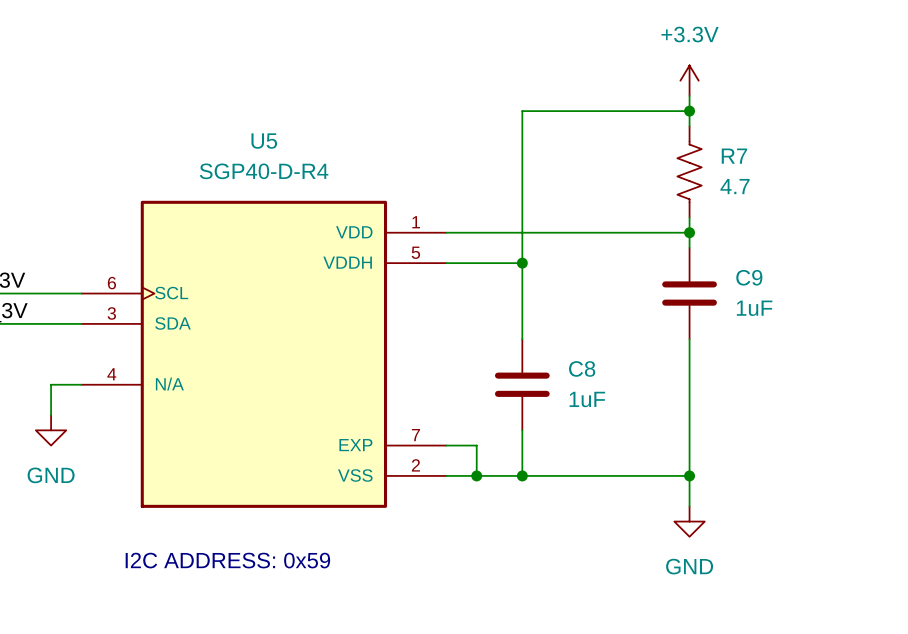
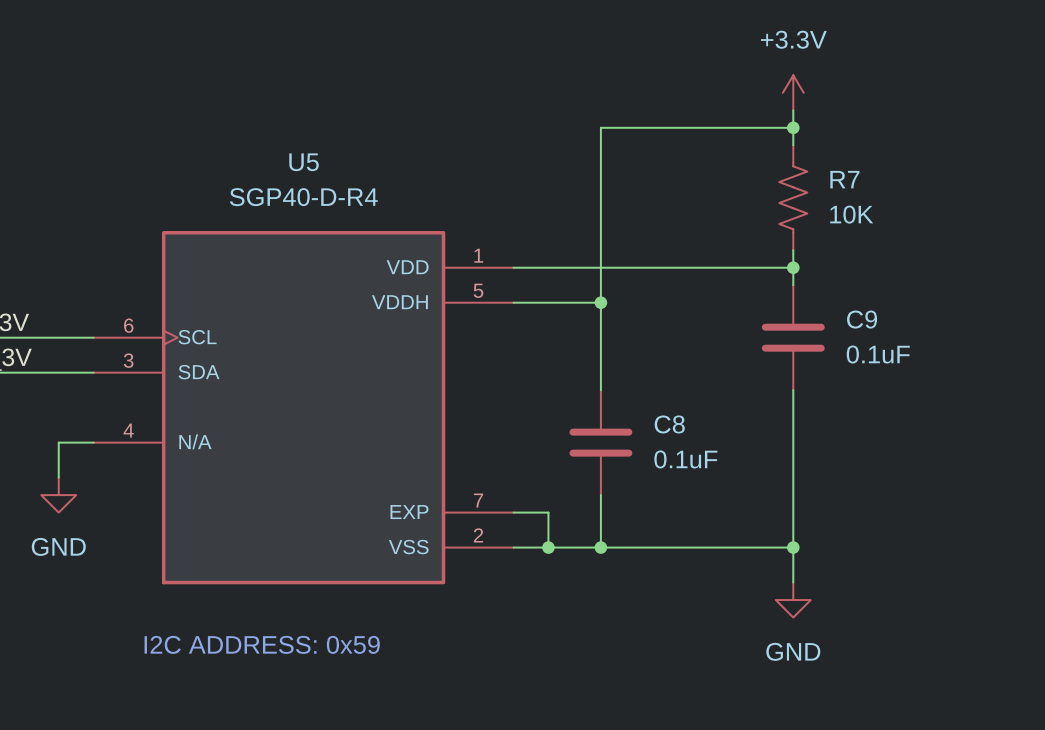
R7 value: 4.7 (735, 186) -> 10K (851, 214)
C9 value: 1uF (754, 308) -> 0.1uF (878, 354)
C8 value: 1uF (587, 399) -> 0.1uF (685, 459)

